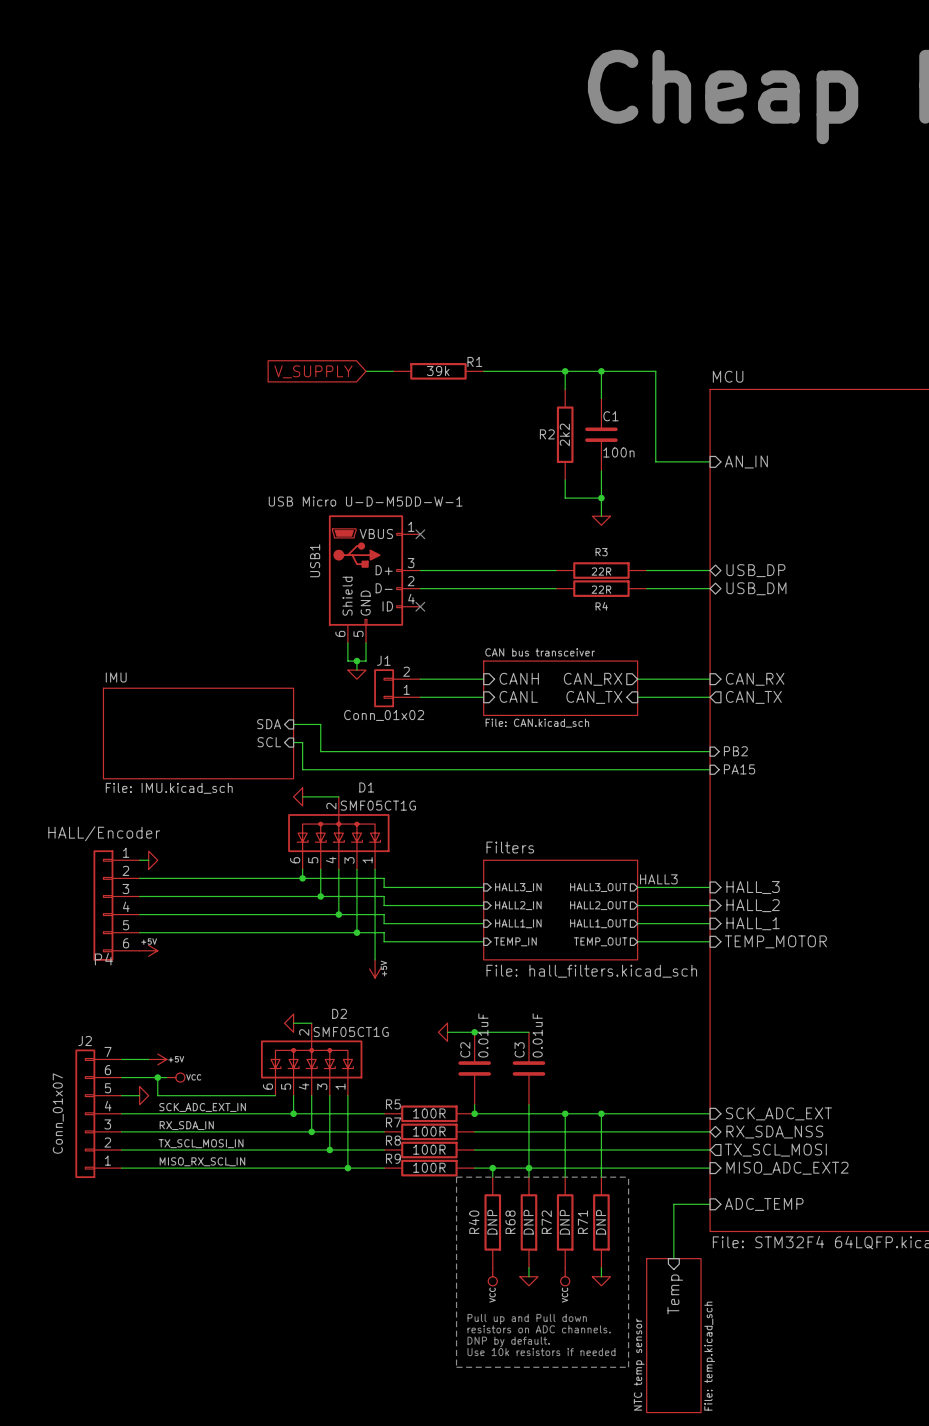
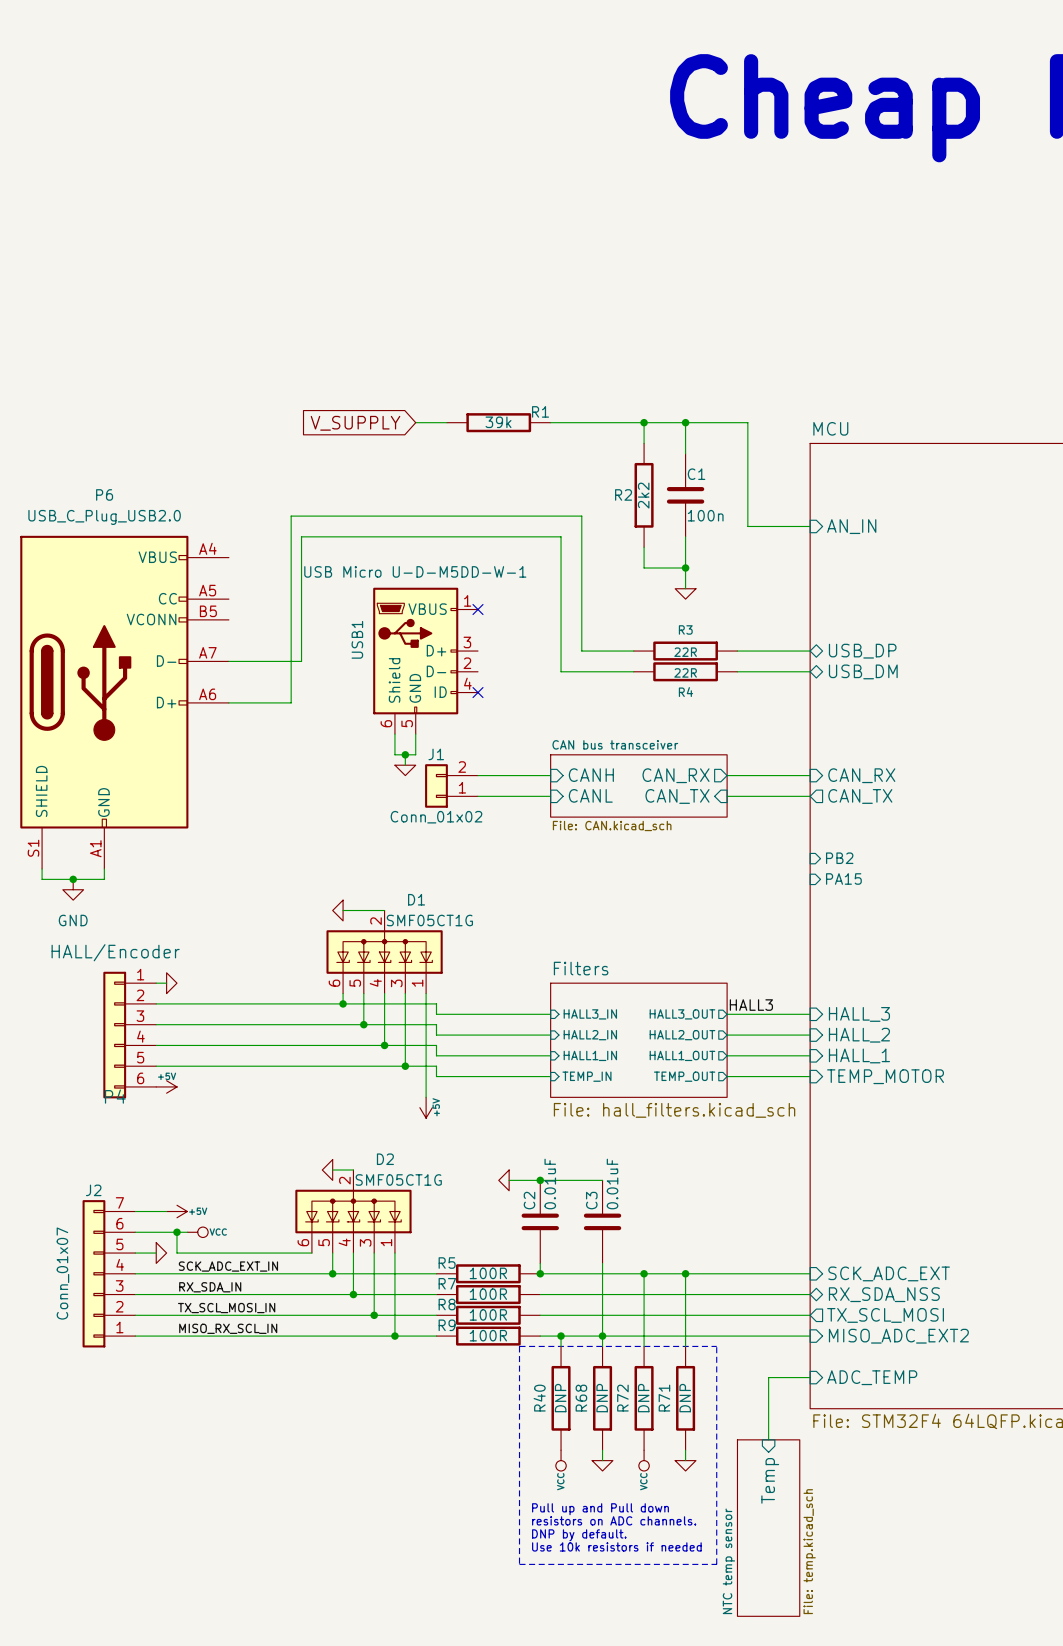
wire: (420, 570) (510, 570) -> (228, 702) (291, 702) (291, 516) (581, 516) (581, 651)
wire: (420, 588) (492, 588) -> (228, 661) (301, 661) (301, 536) (561, 536) (561, 671)
P6: none -> USB_C_Plug_USB2.0 (124, 702)
sheet pin: SDA (269, 724) -> none
wire: (293, 724) (320, 724) (320, 751) (710, 751) -> none
sheet IMU: File: IMU.kicad_sch (198, 733) -> none
sheet pin: SCL (269, 742) -> none
wire: (293, 742) (302, 742) (302, 769) (710, 769) -> none
wire: none -> (42, 868) (42, 879) (104, 879) (104, 868)
junction: none -> (73, 879)
power symbol: none -> GND (73, 889)

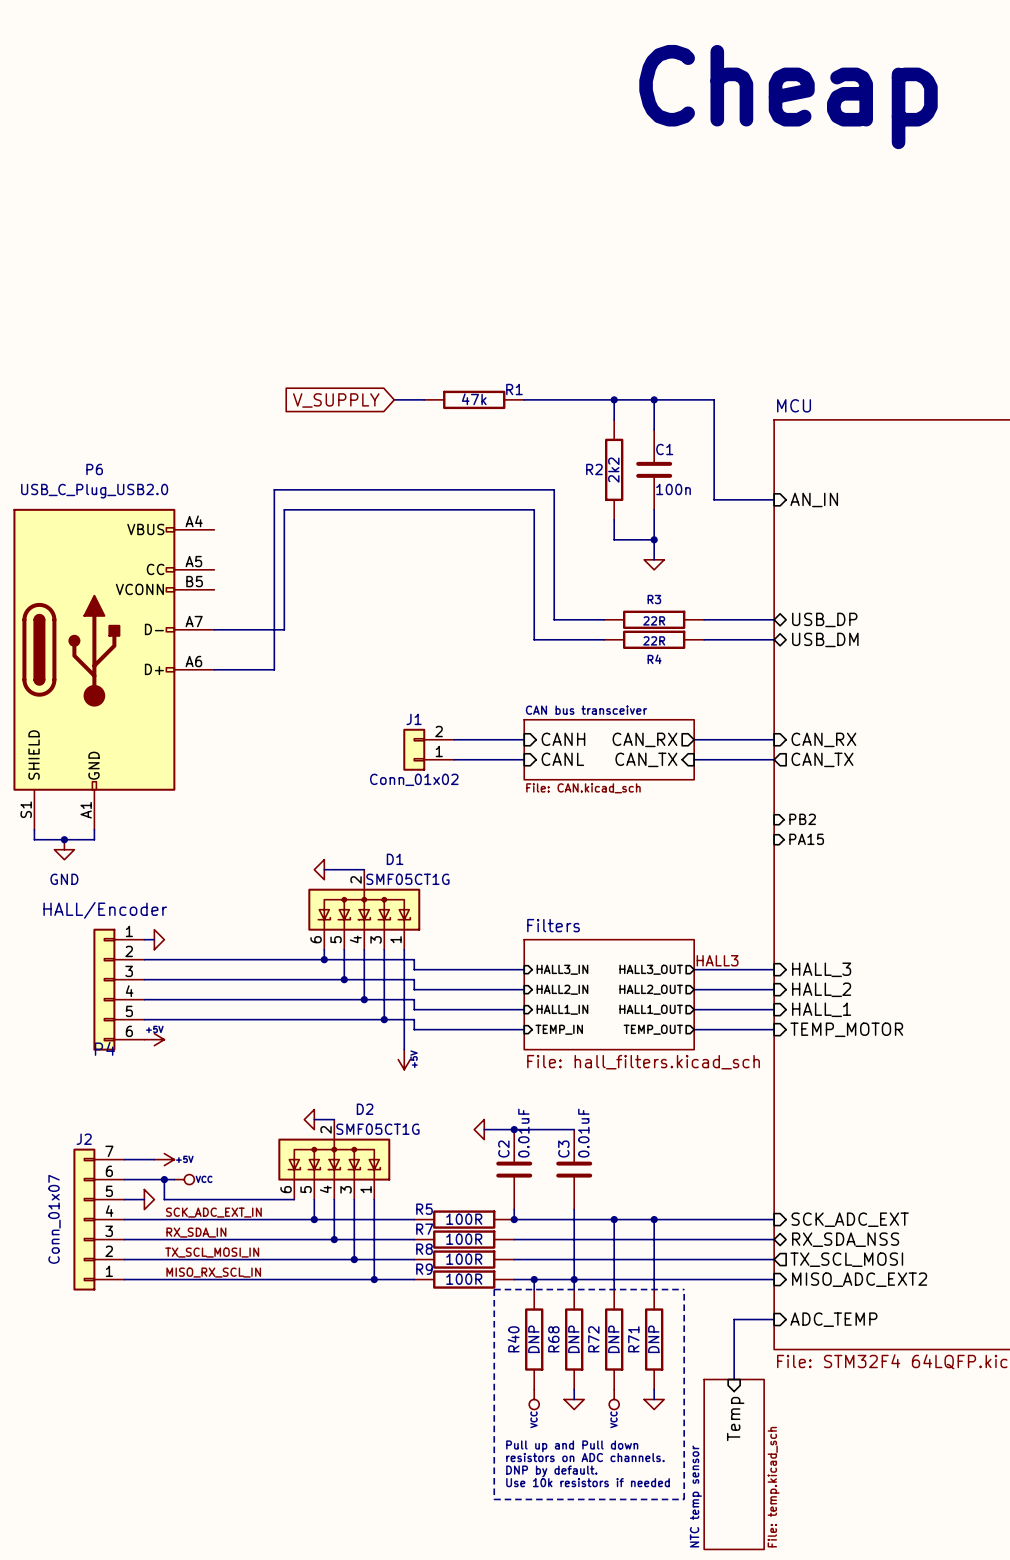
R1 value: 39k (498, 422) -> 47k (474, 399)
no-connect mark: (477, 609) -> none
USB1: USB Micro U-D-M5DD-W-1 (425, 660) -> none
no-connect mark: (477, 692) -> none
wire: (394, 734) (394, 754) (415, 754) (415, 734) -> none
wire: (405, 754) (405, 765) -> none
junction: (405, 754) -> none
power symbol: (405, 770) -> none

